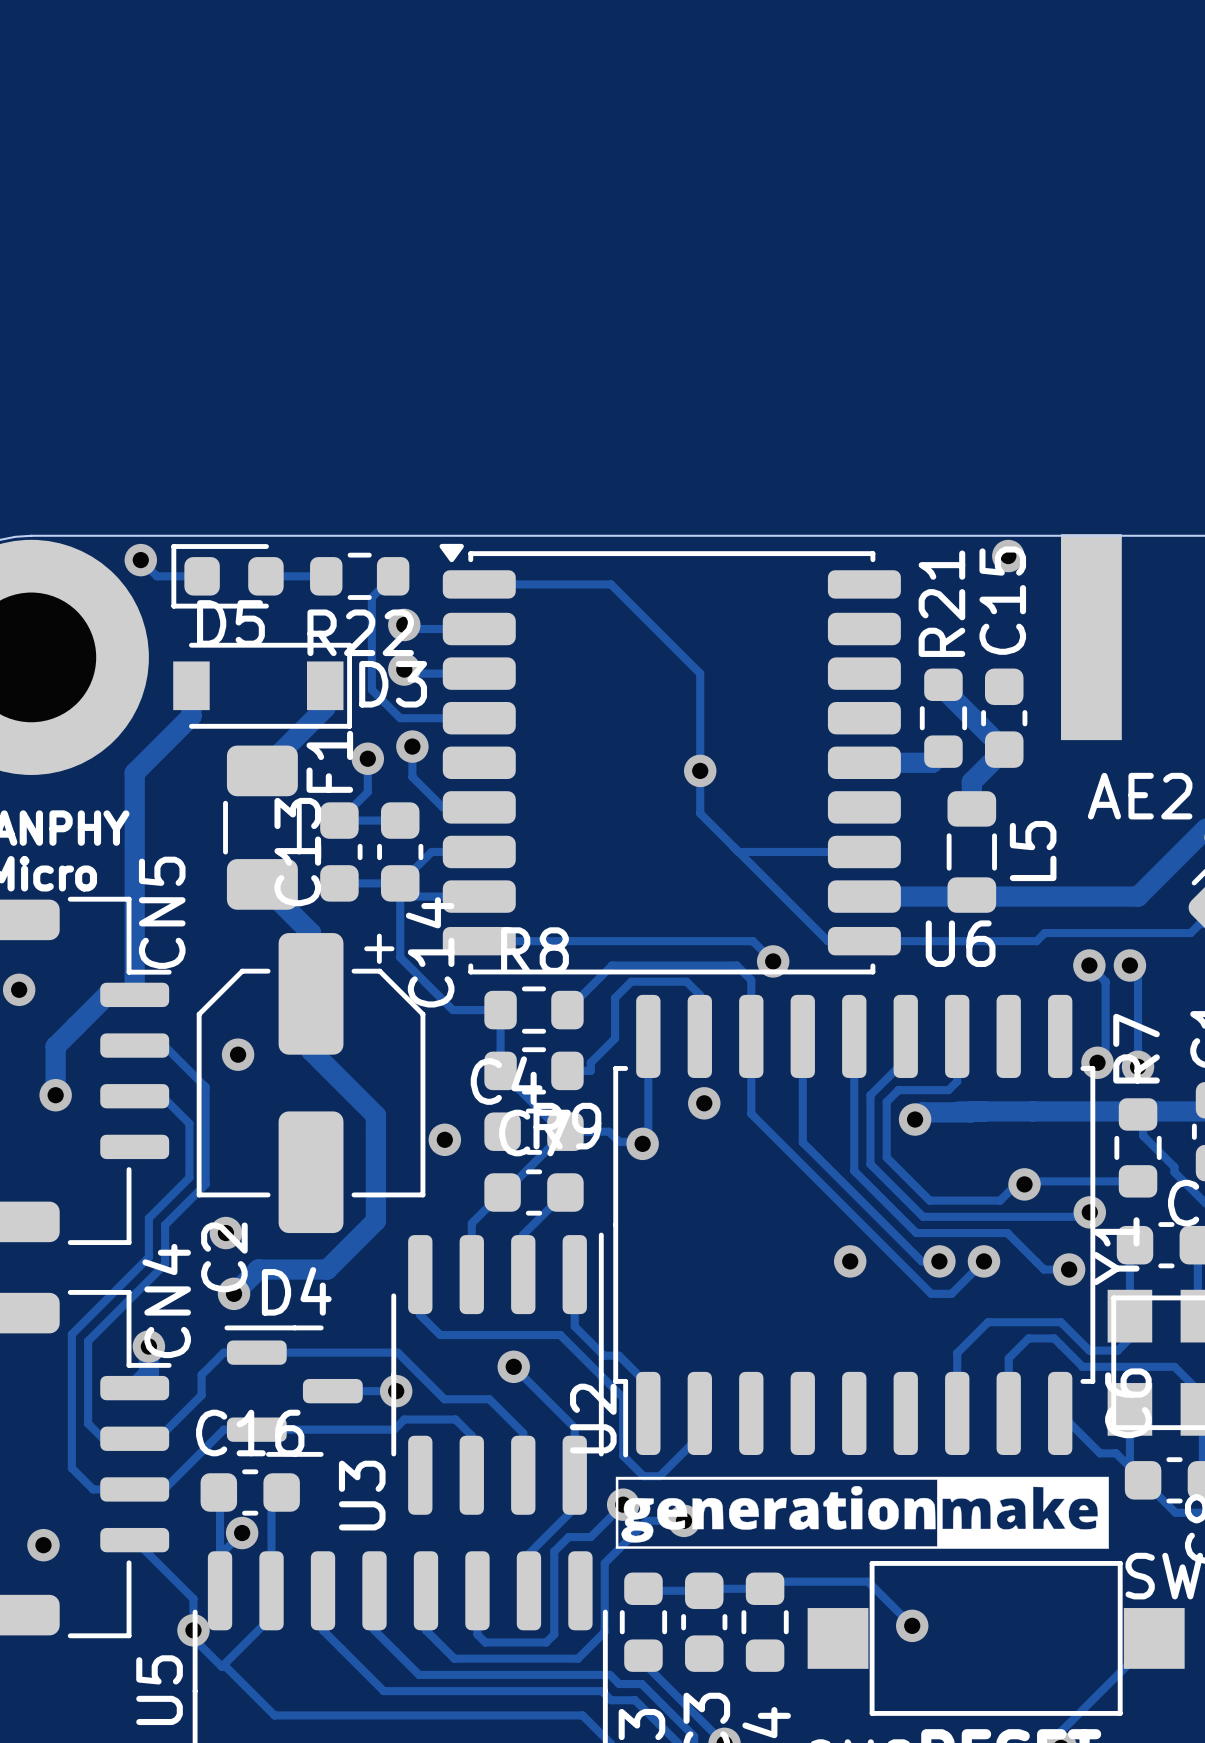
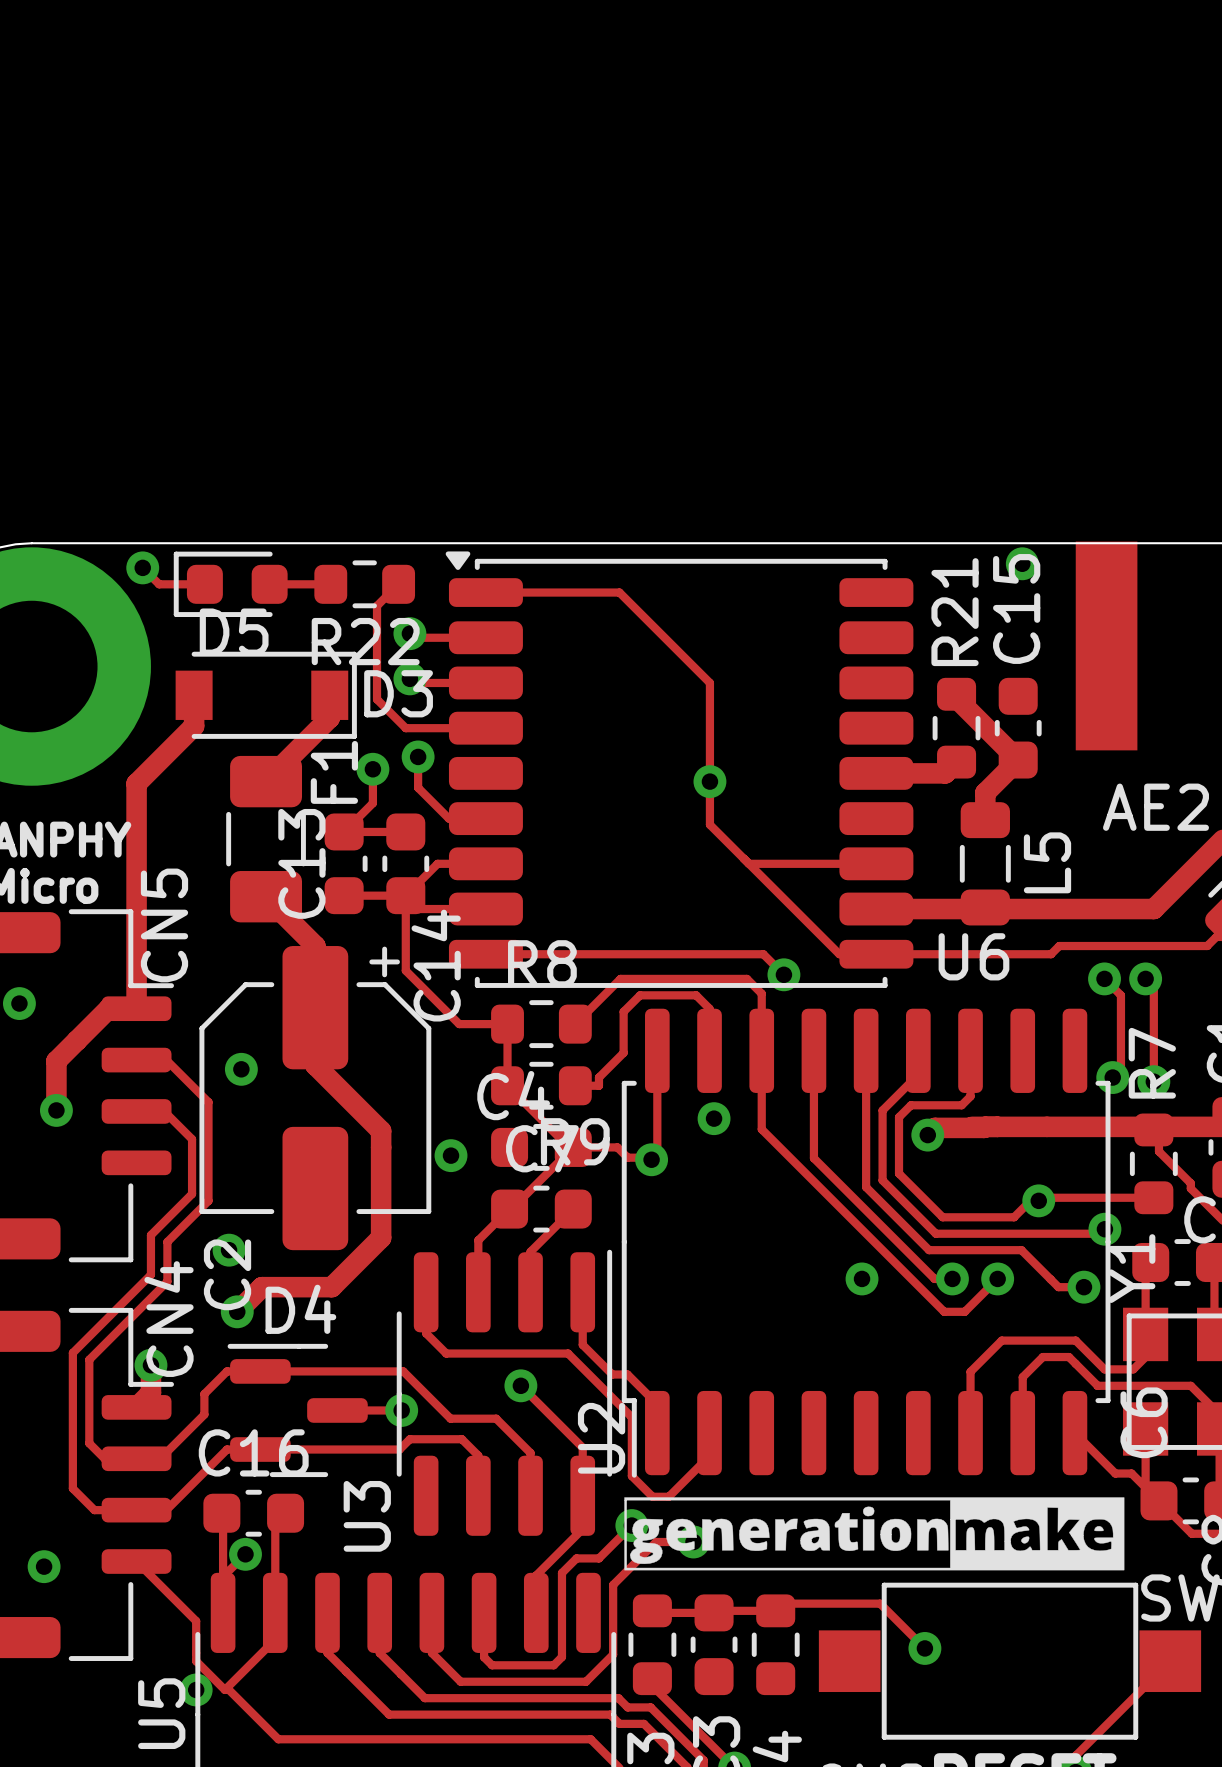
via position: (193, 1630) -> (196, 1689)

